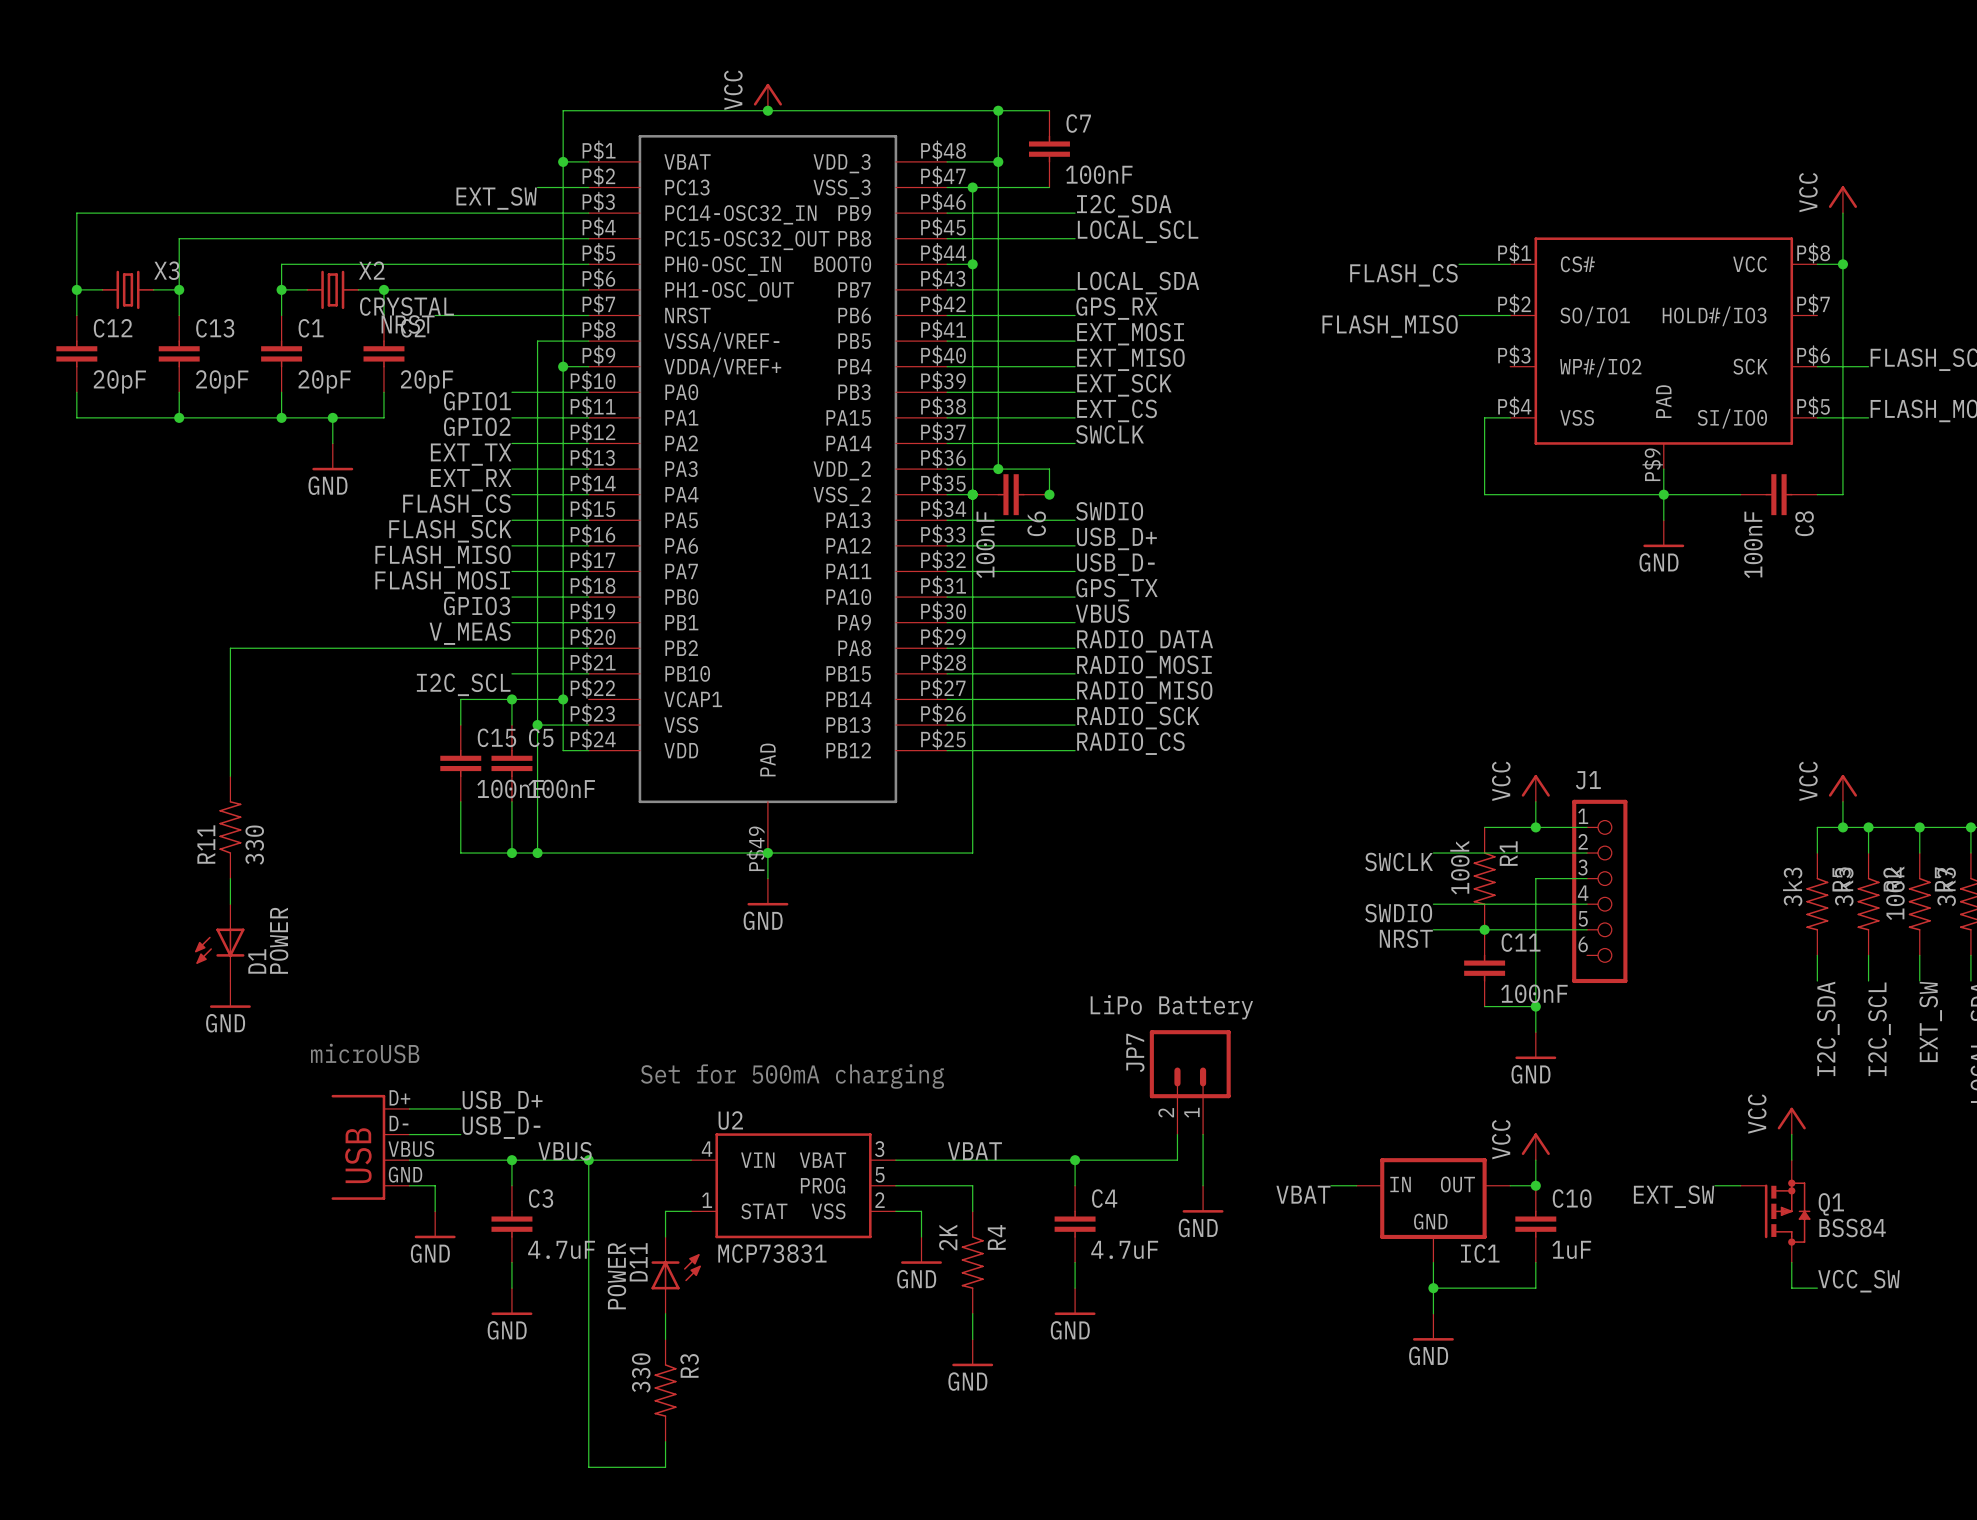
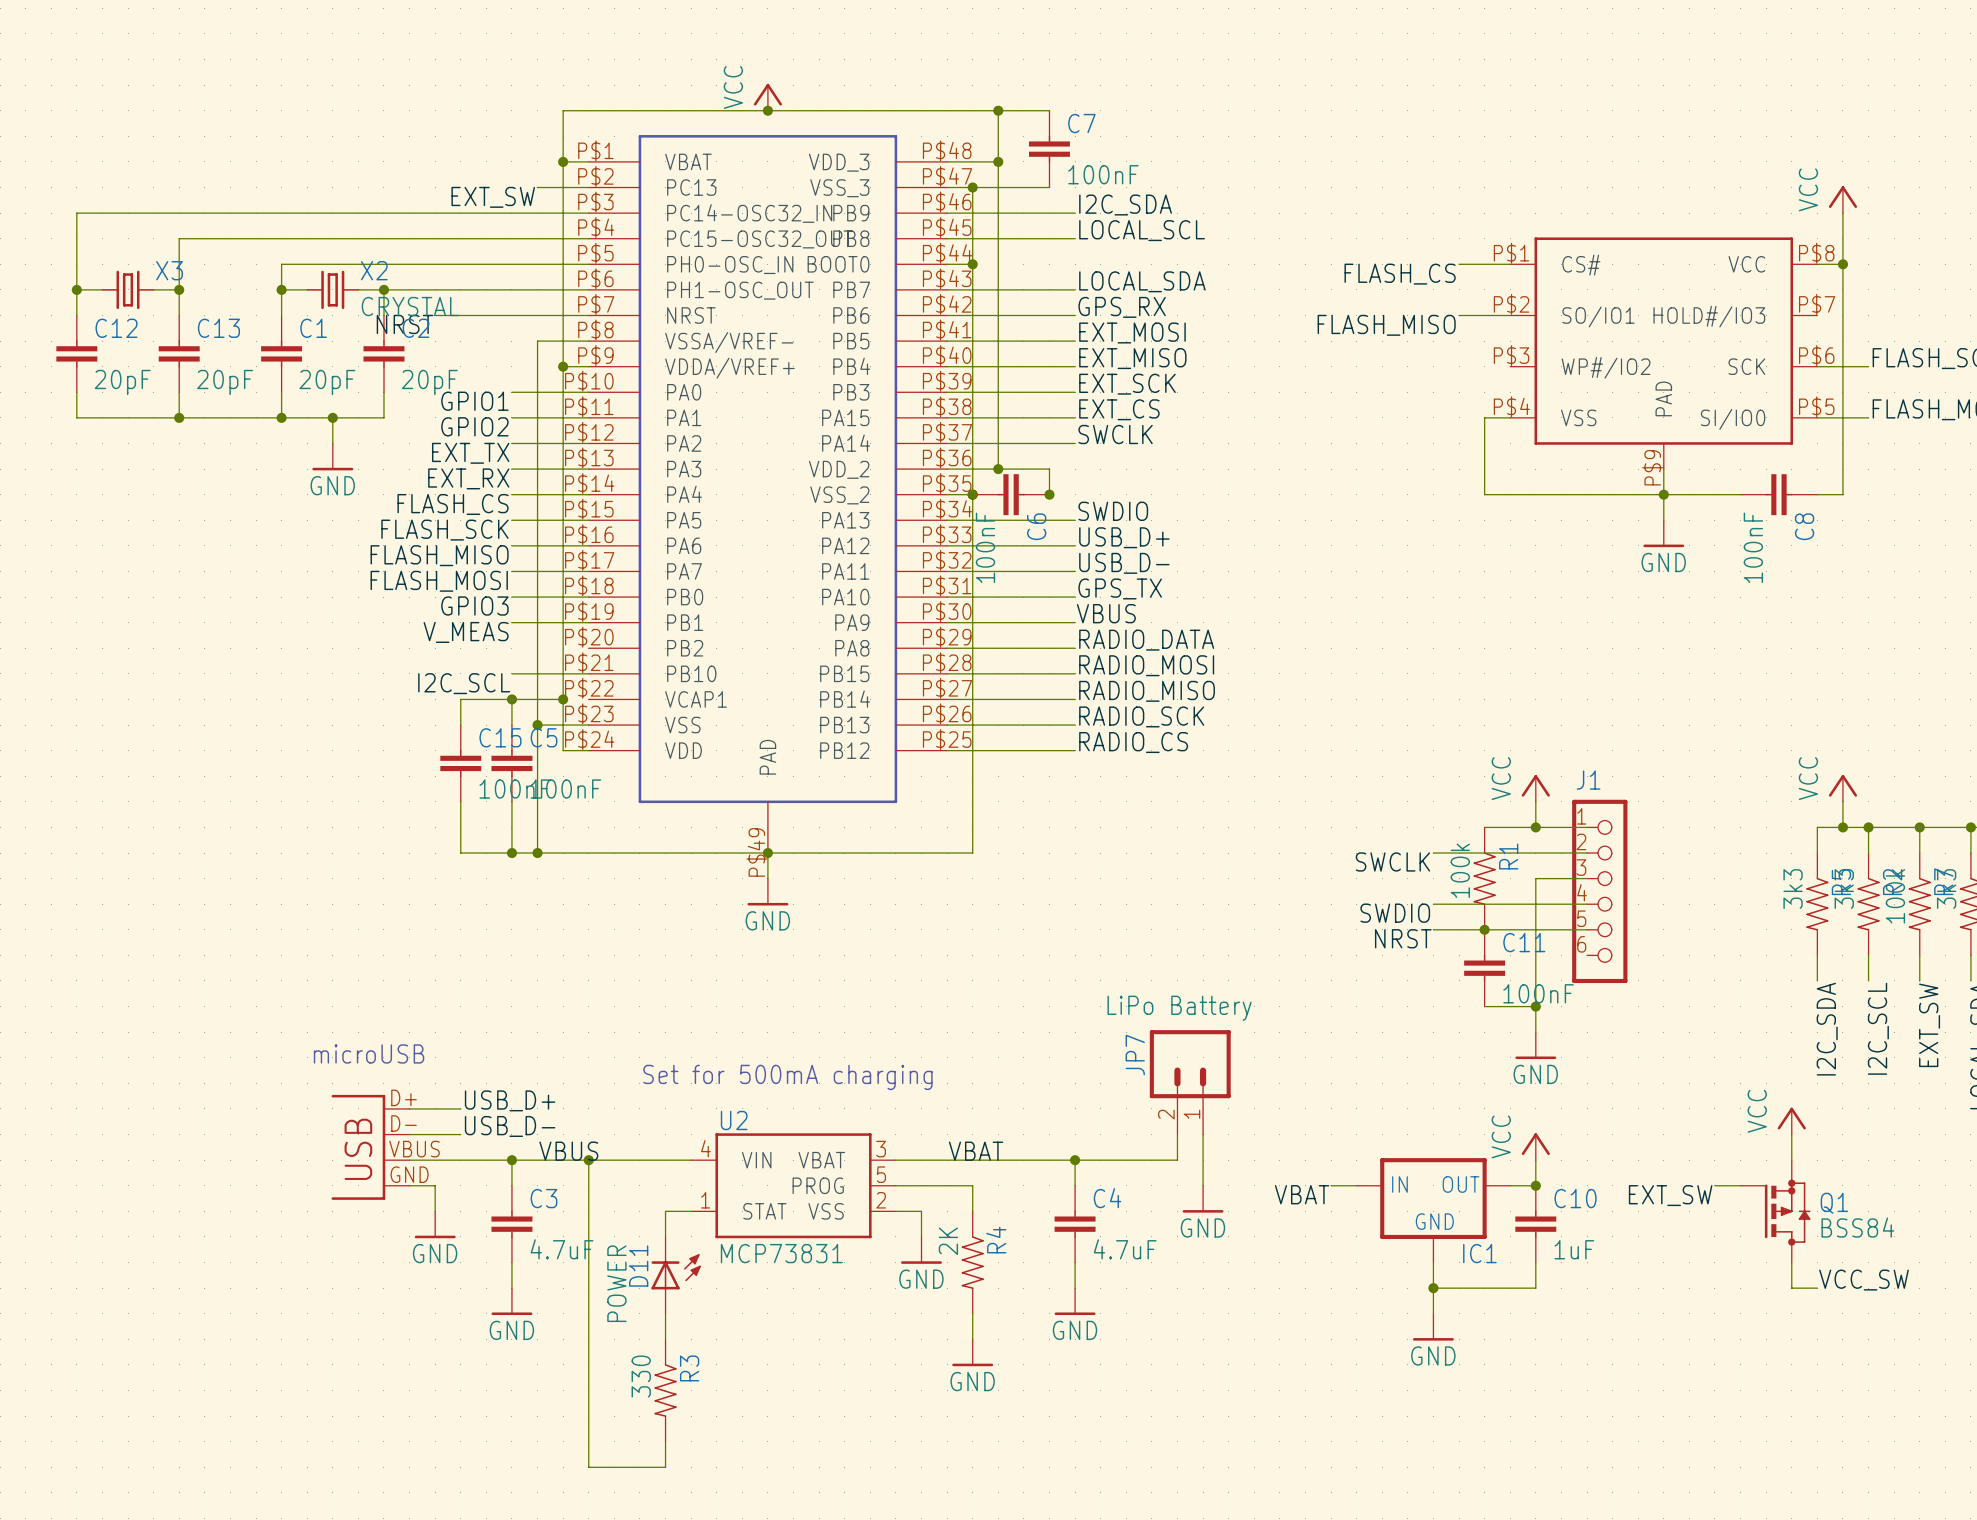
wire: (588, 648) (230, 648) (230, 776) -> none
R11: 330 (230, 827) -> none
wire: (230, 878) (230, 904) -> none
D1: POWER (219, 942) -> none
power symbol: GND (230, 994) -> none

